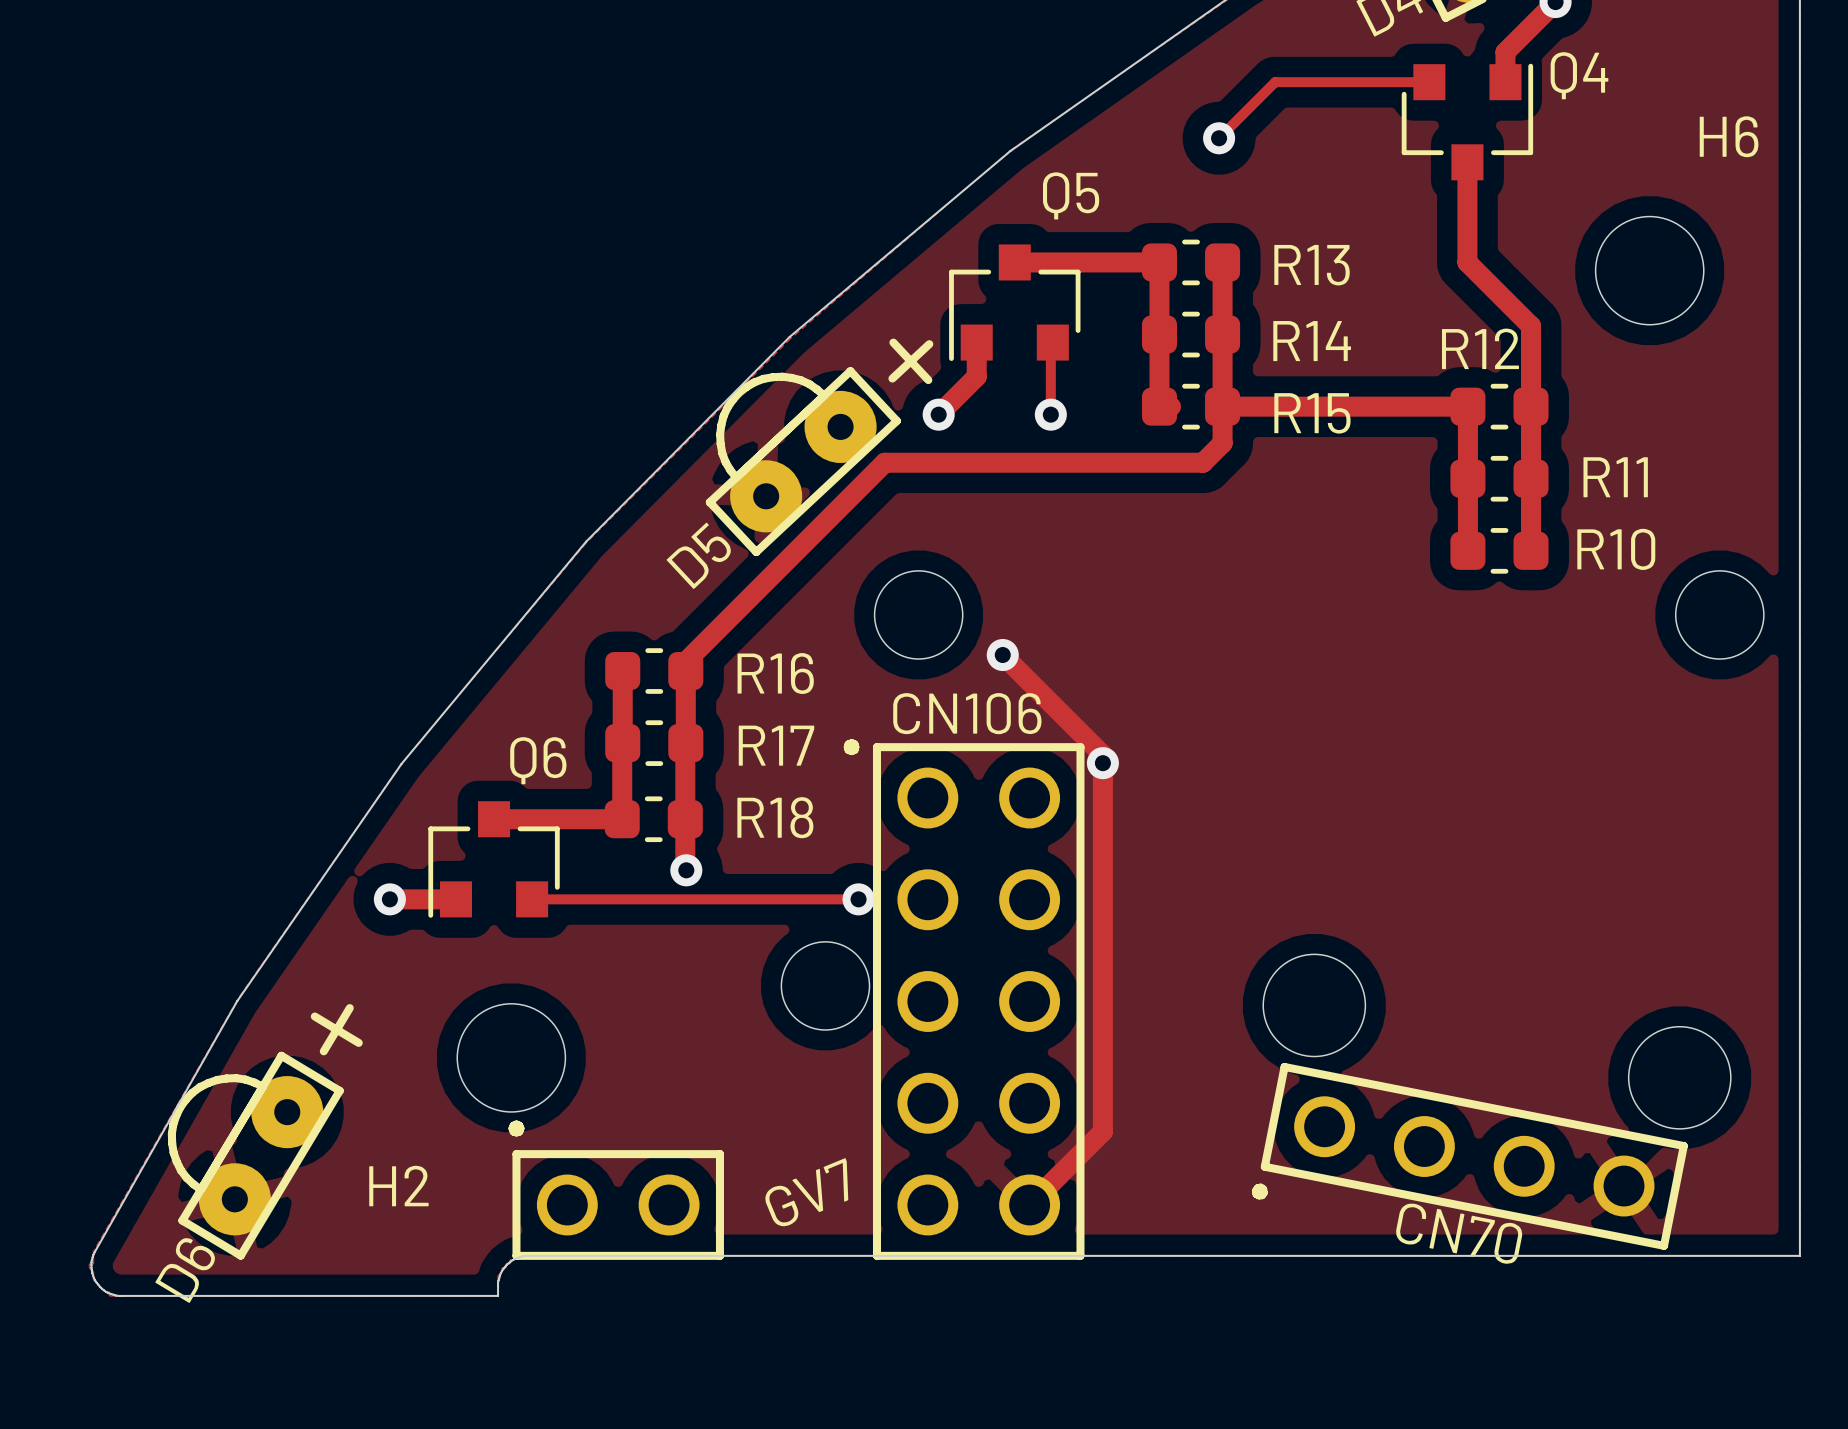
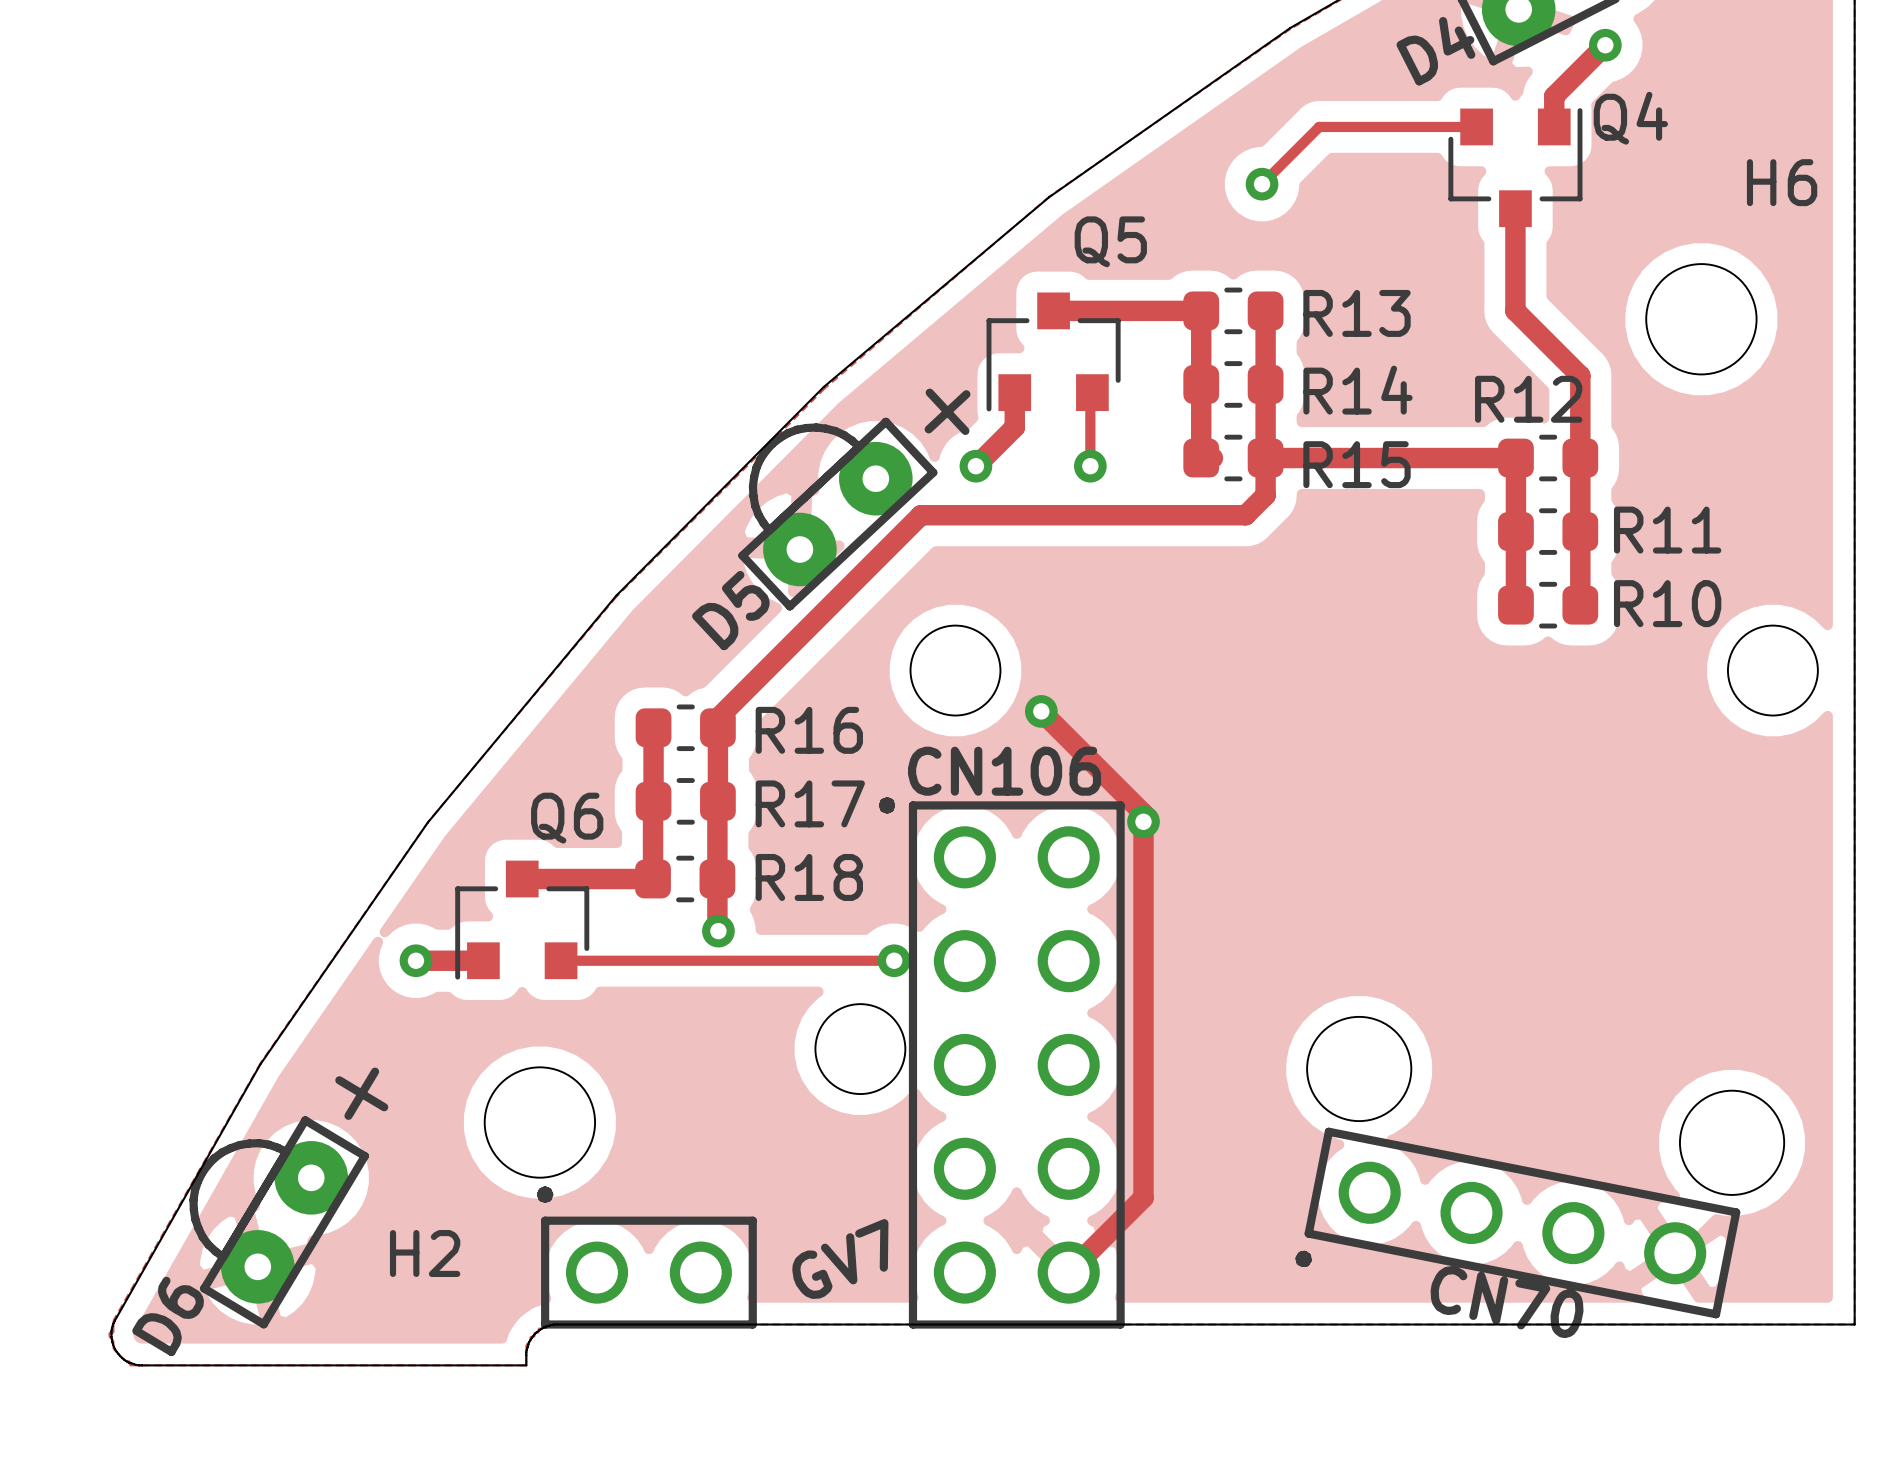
D6 name position: D6 (185, 1270) -> D6 (168, 1316)

